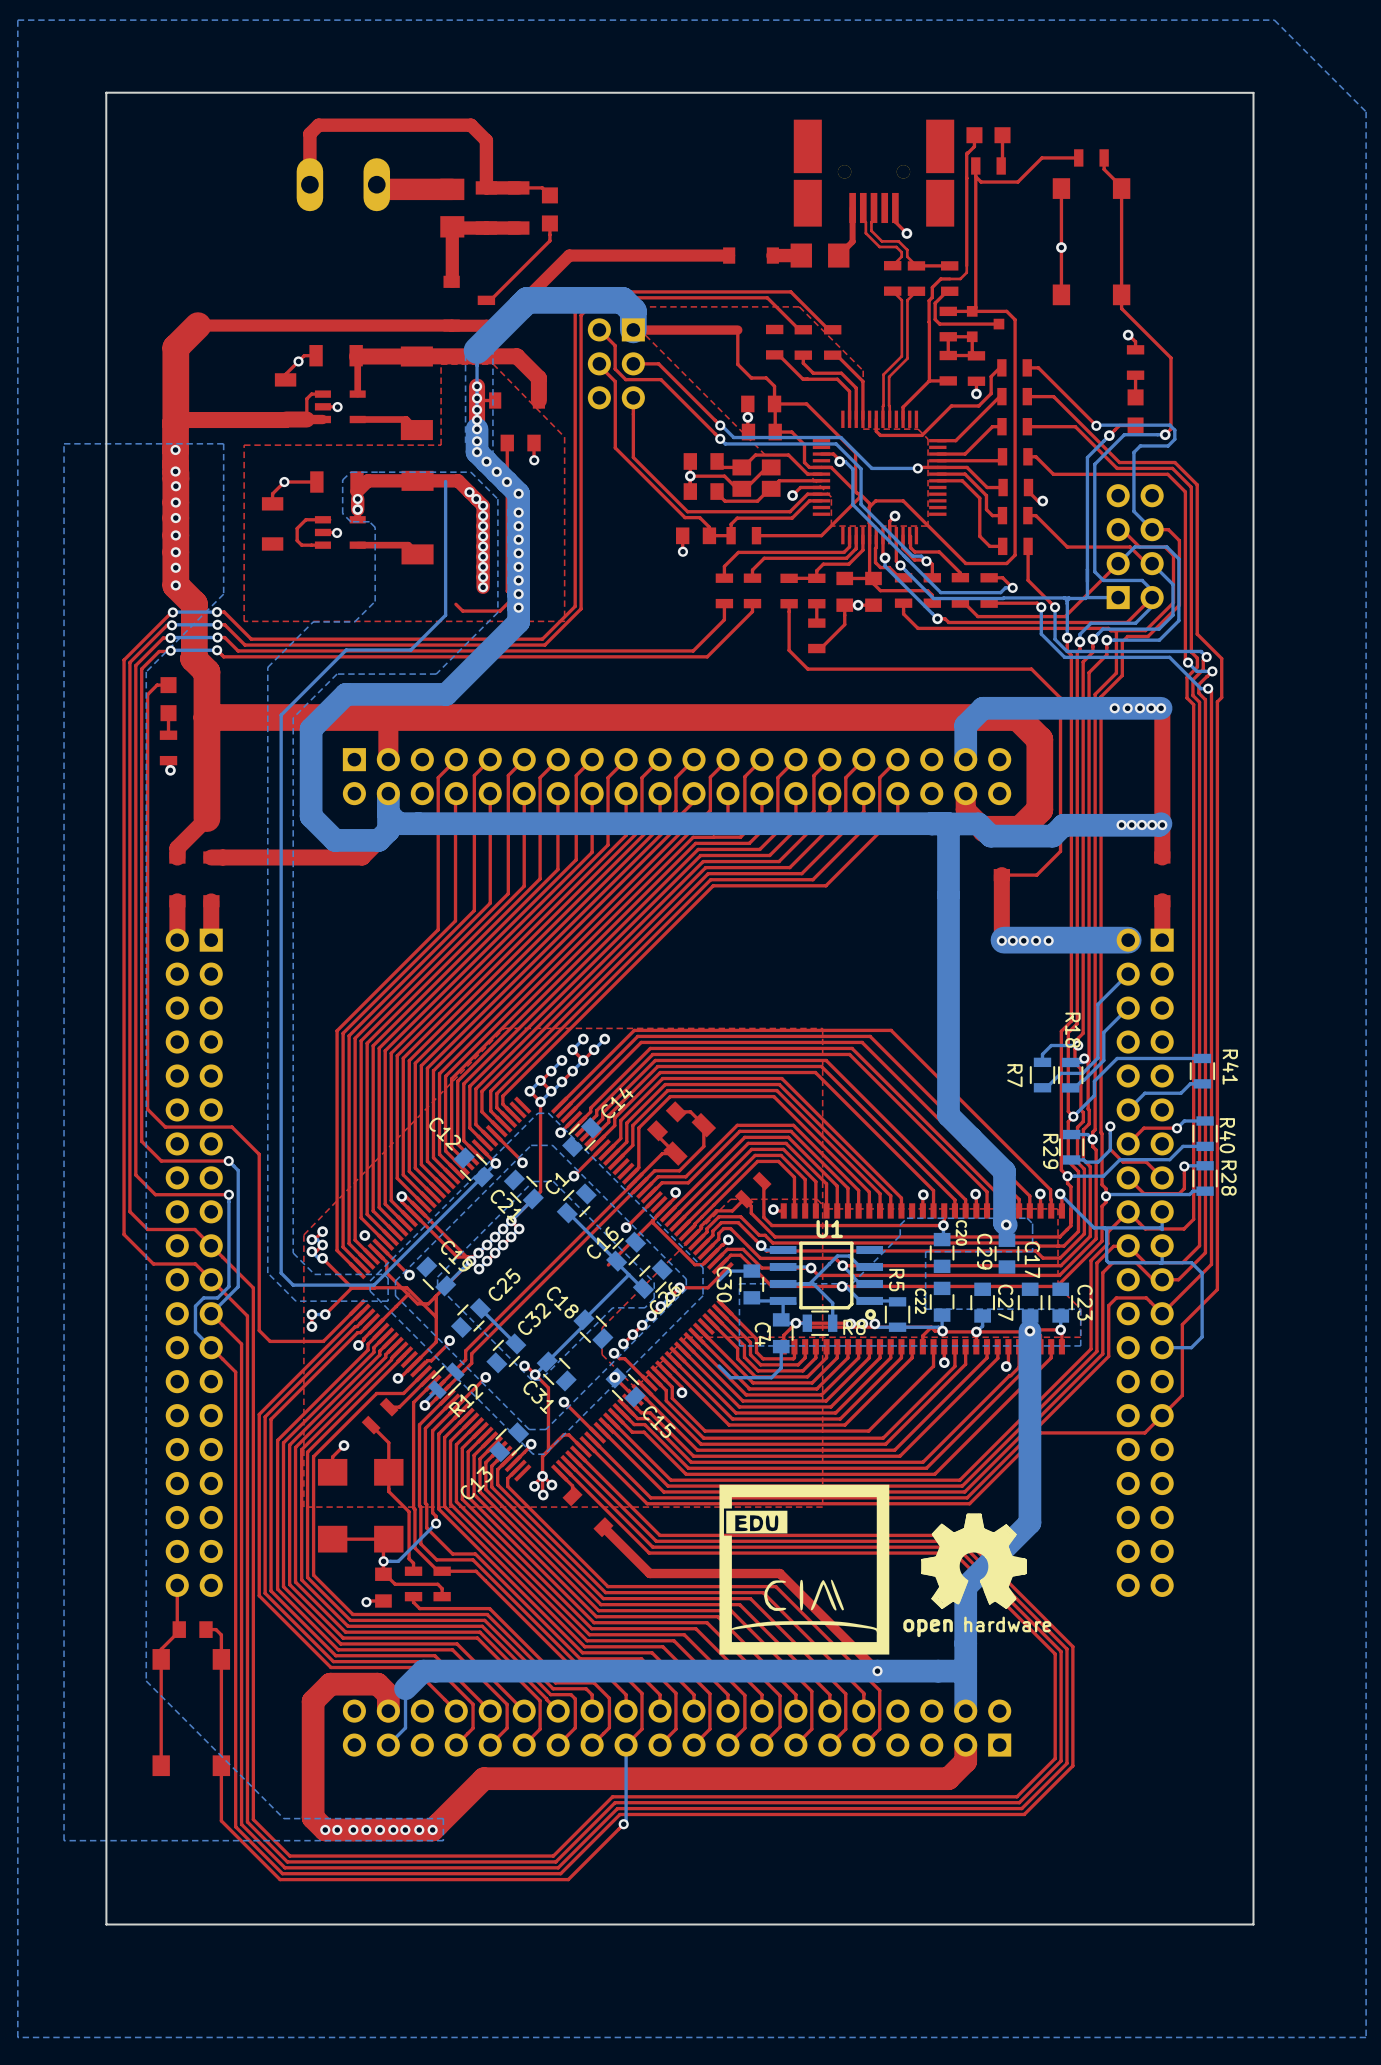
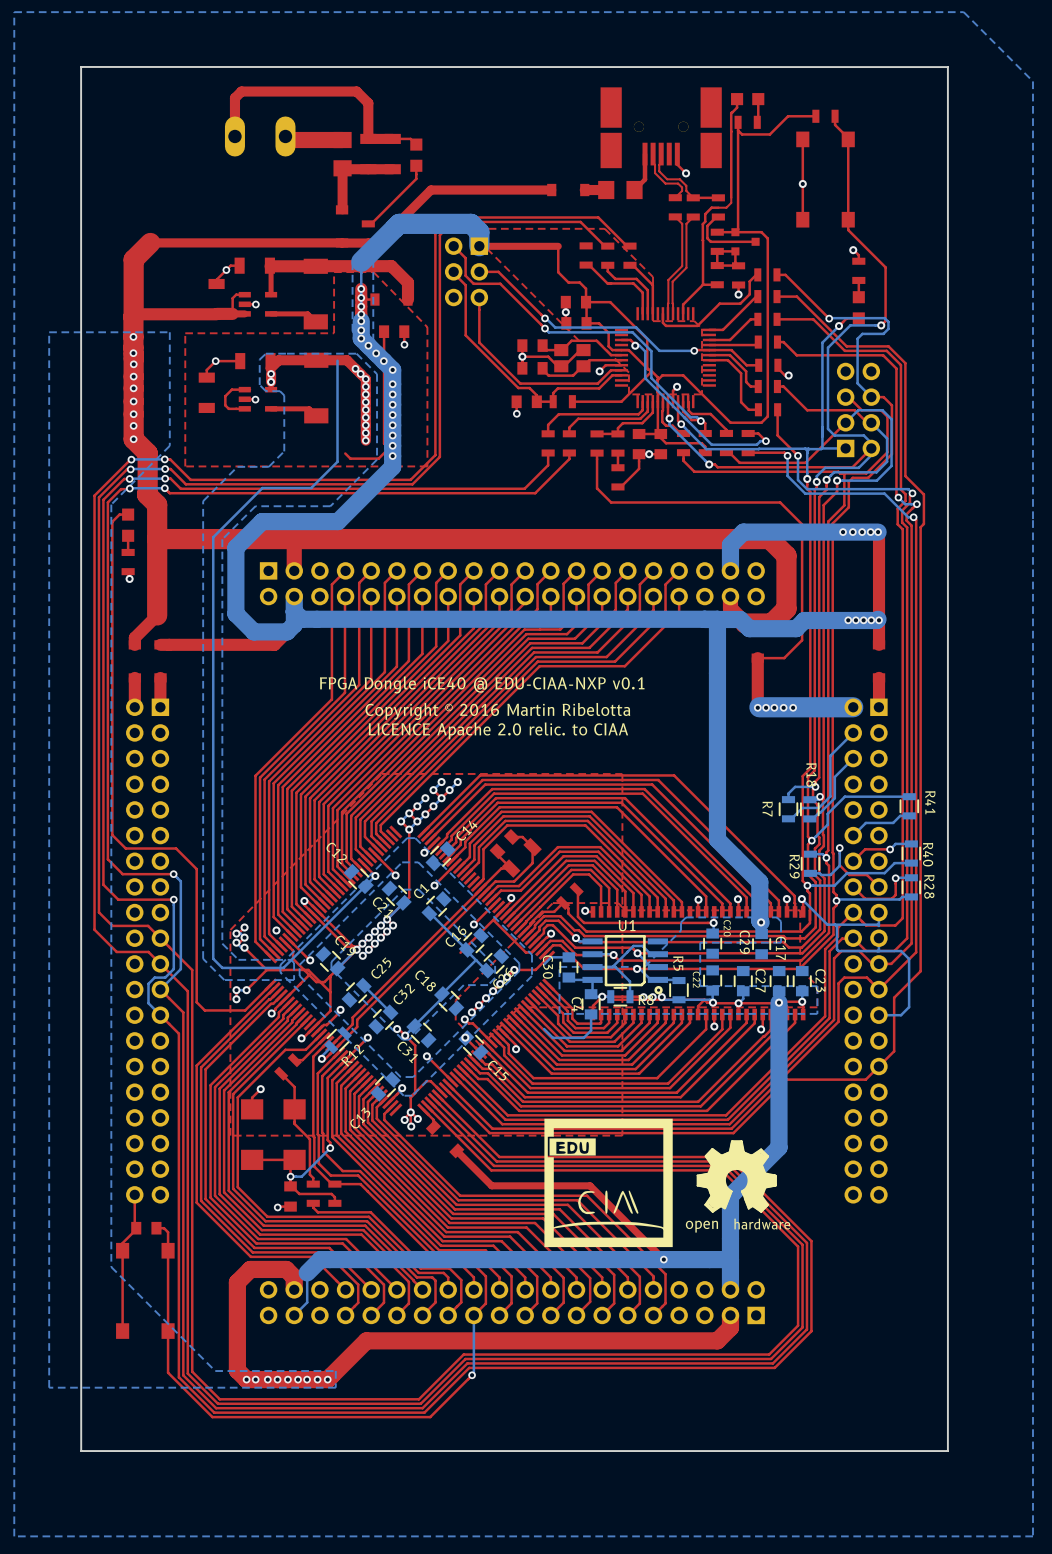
text: none -> FPGA Dongle iCE40 @ EDU-CIAA-NXP v0.1 (482, 684)
text: none -> Copyright © 2016 Martin Ribelotta (497, 711)
text: none -> LICENCE Apache 2.0 relic. to CIAA (498, 730)

